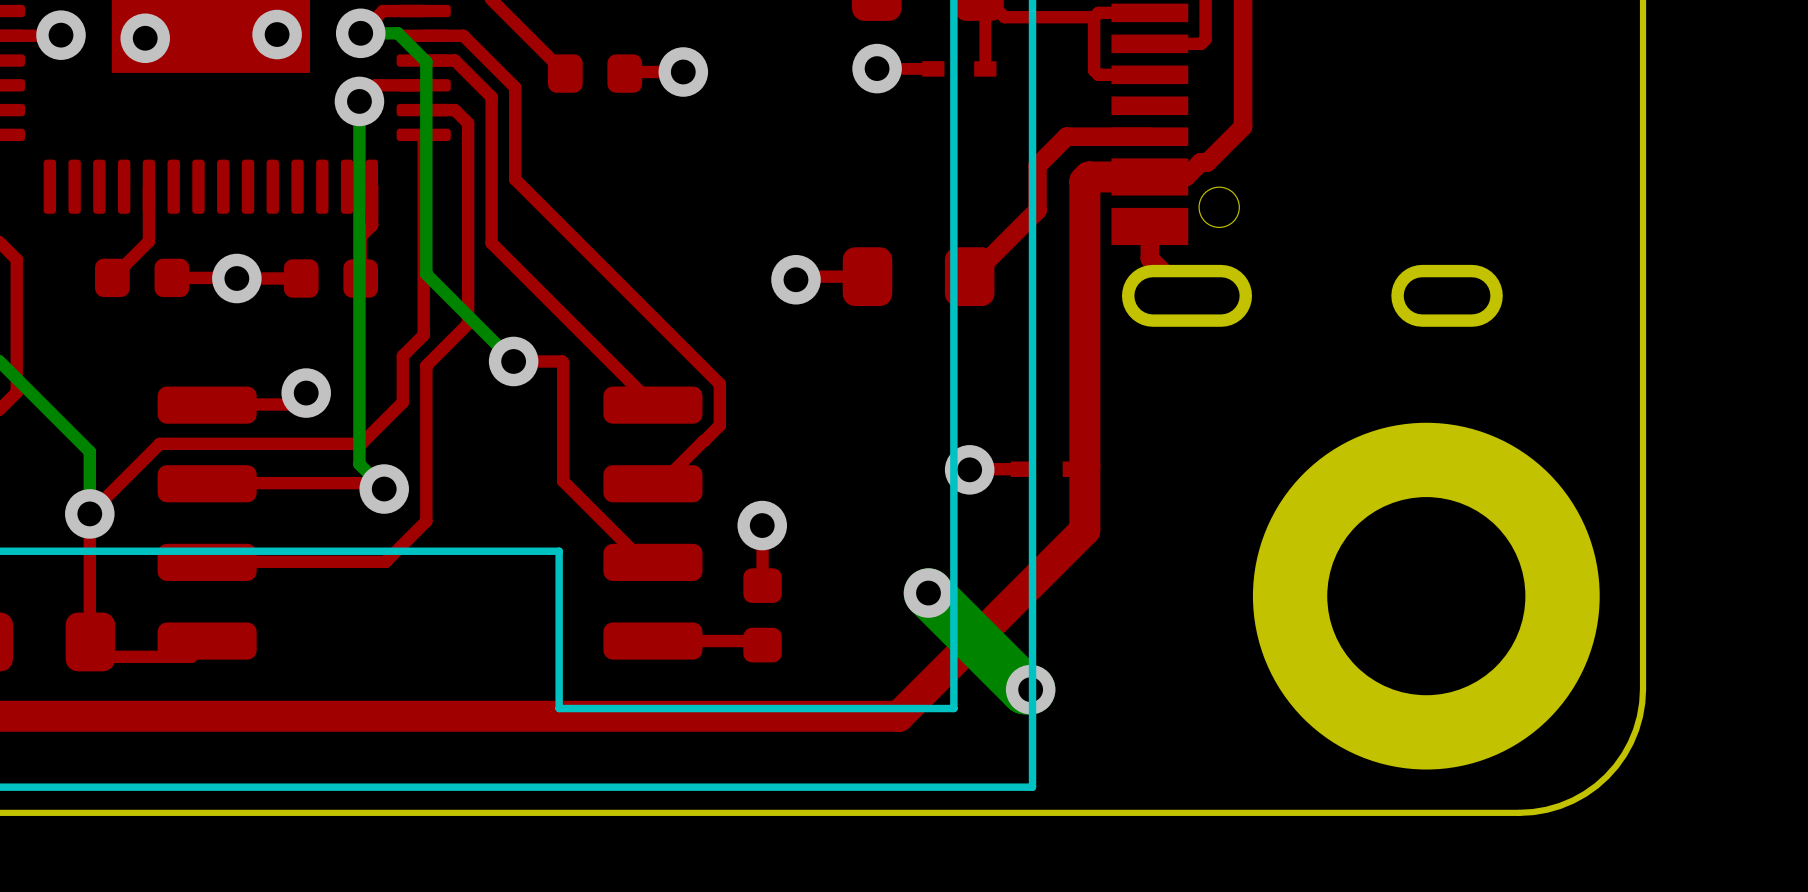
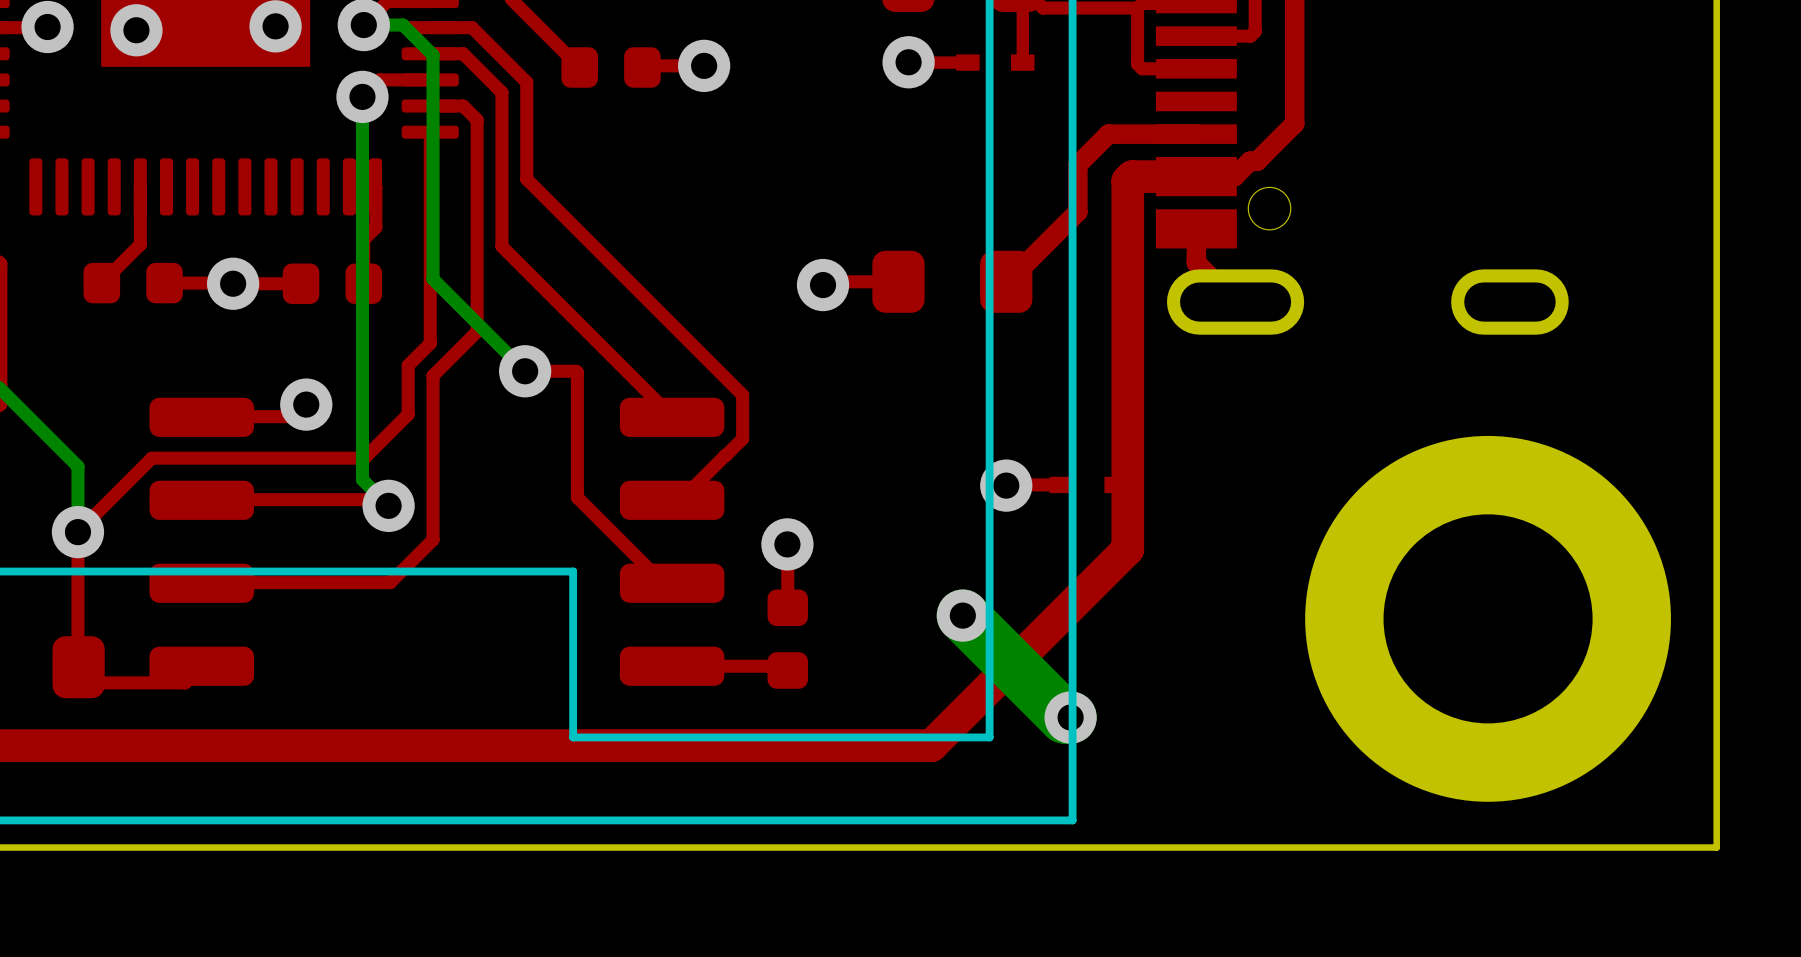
board edge: (1643, 689) (1639, 716) (1636, 729) (1624, 754) (1606, 776) (1585, 793) (1560, 805) (1546, 809) (1519, 812) -> (1716, 716) (1716, 847) (1586, 847)

